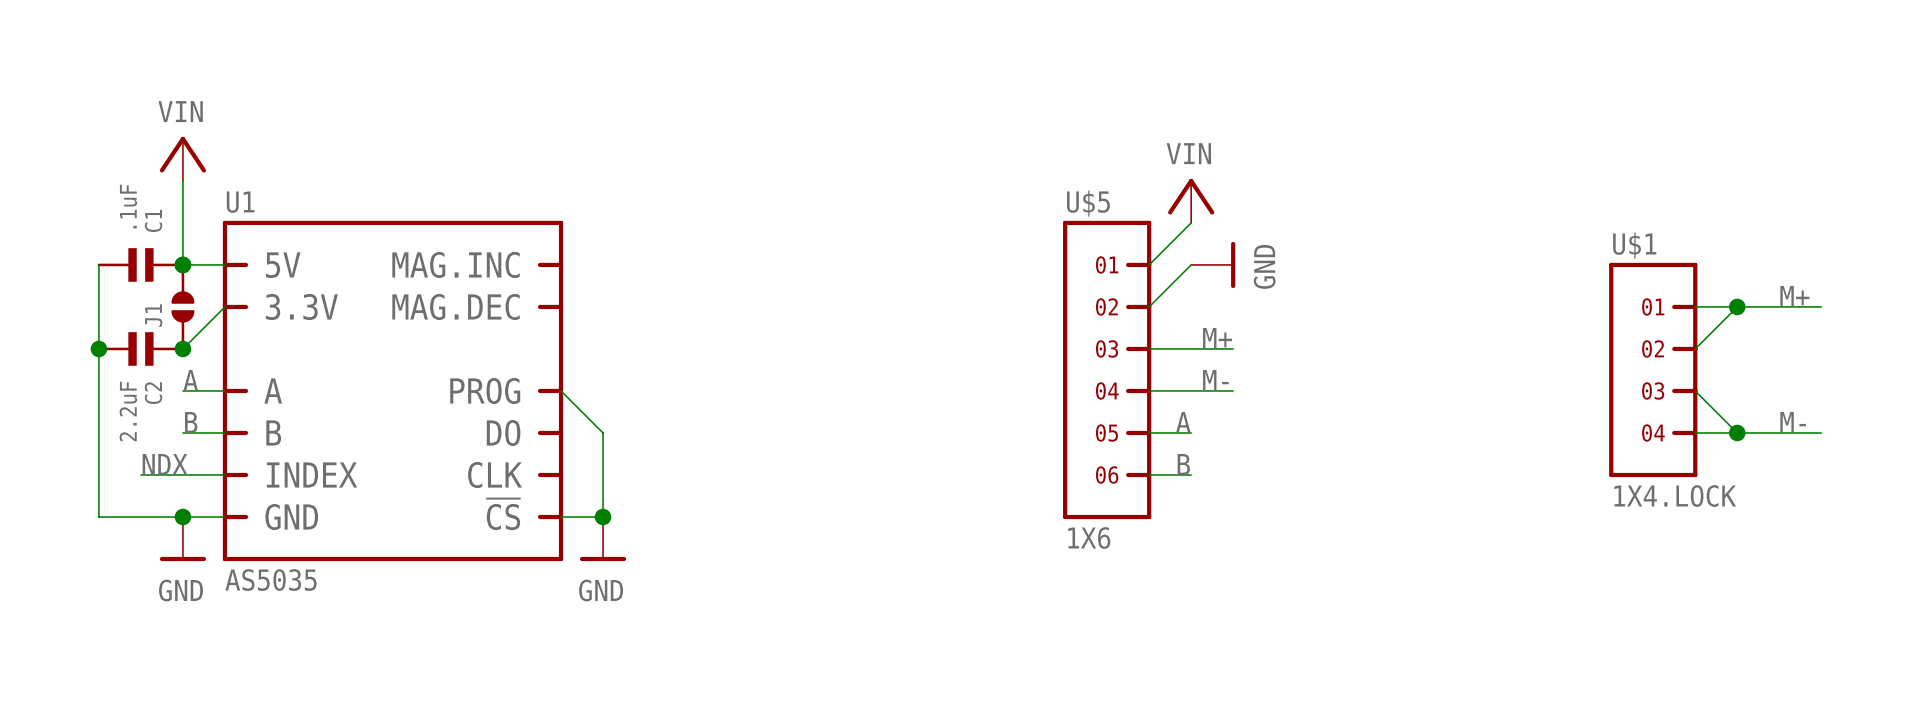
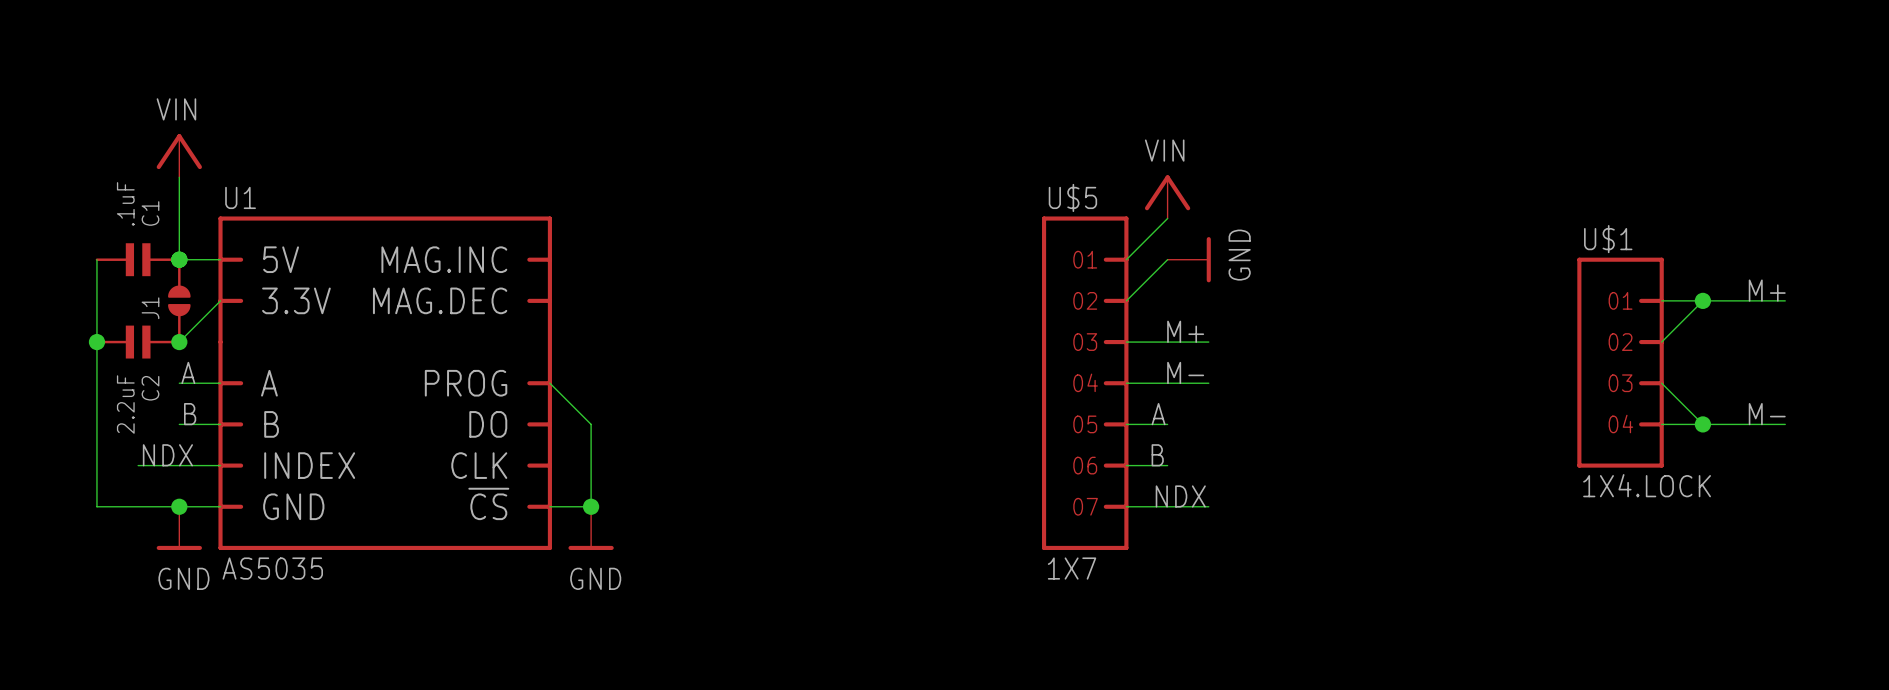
U$5 symbol: [1063, 220, 1152, 520] -> [1041, 216, 1129, 551]
label: none -> NDX (1180, 496)
wire: none -> (1126, 506) (1208, 506)
U$5 value: 1X6 (1089, 538) -> 1X7 (1072, 568)

